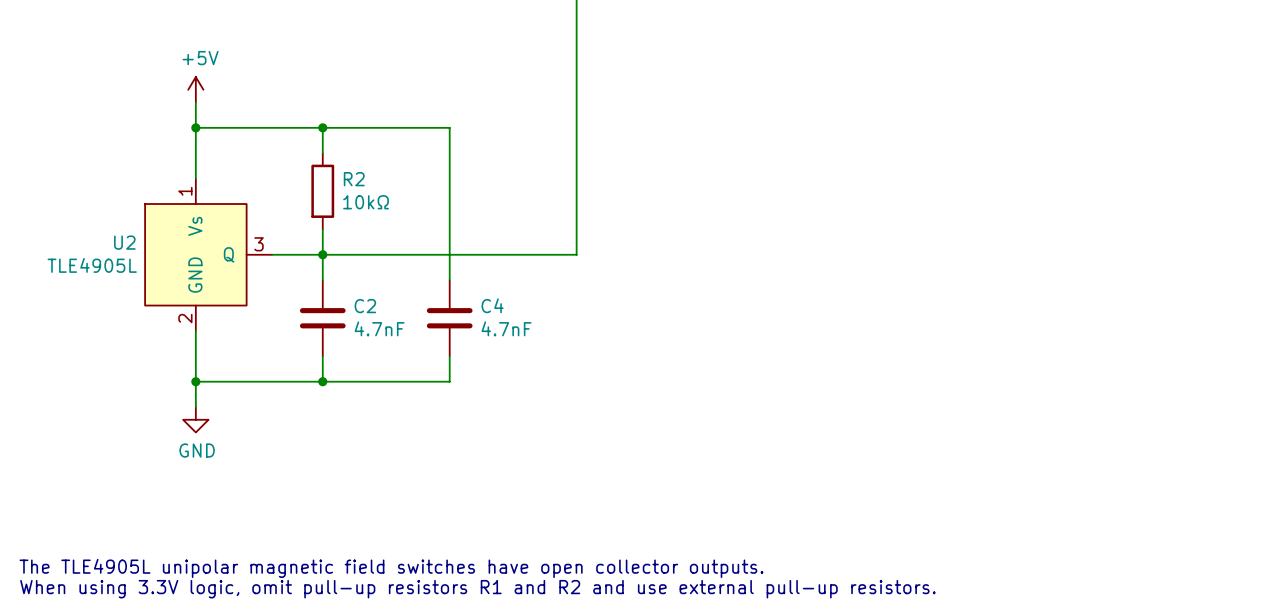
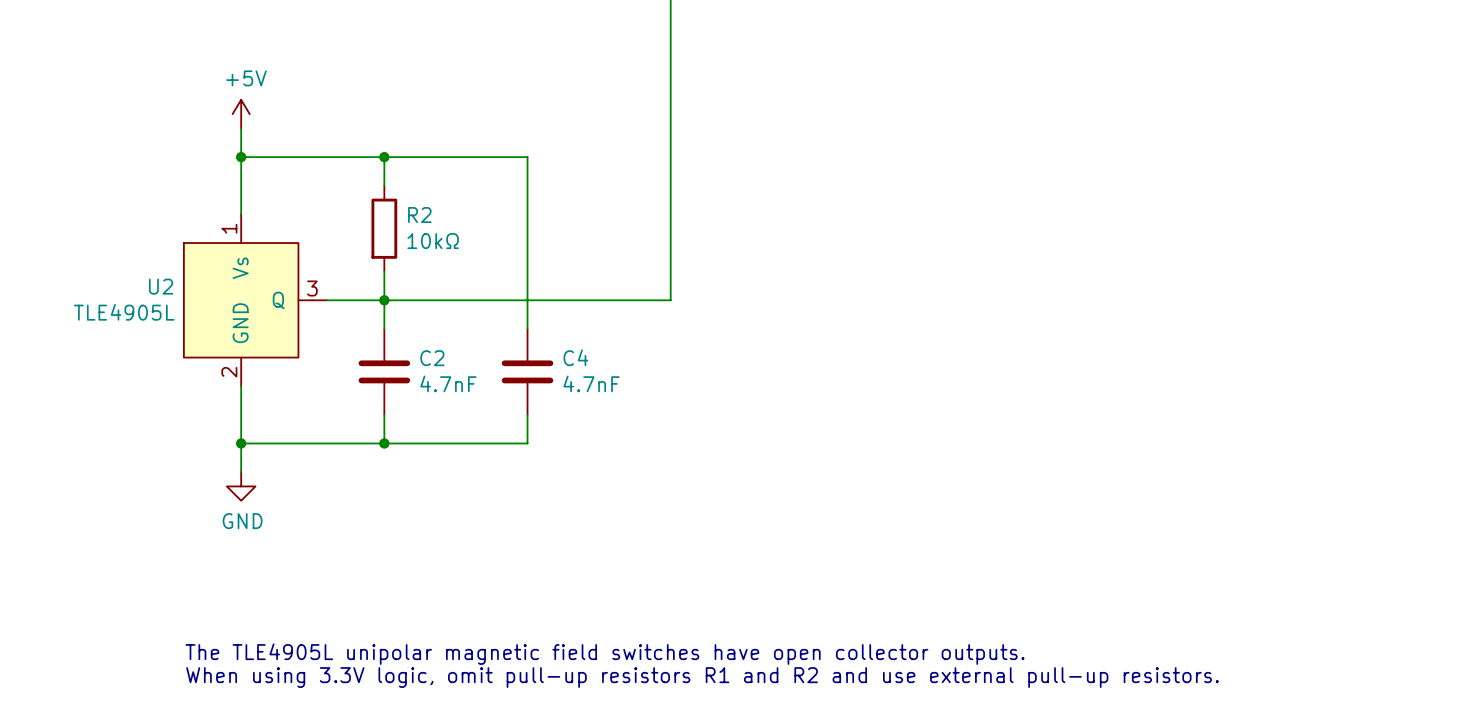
text position: The TLE4905L unipolar magnetic field switches have open collector outputs. (391, 568) -> The TLE4905L unipolar magnetic field switches have open collector outputs. (605, 654)
text position: When using 3.3V logic, omit pull-up resistors R1 and R2 and use external pull-up resistors. (477, 589) -> When using 3.3V logic, omit pull-up resistors R1 and R2 and use external pull-up resistors. (702, 677)

